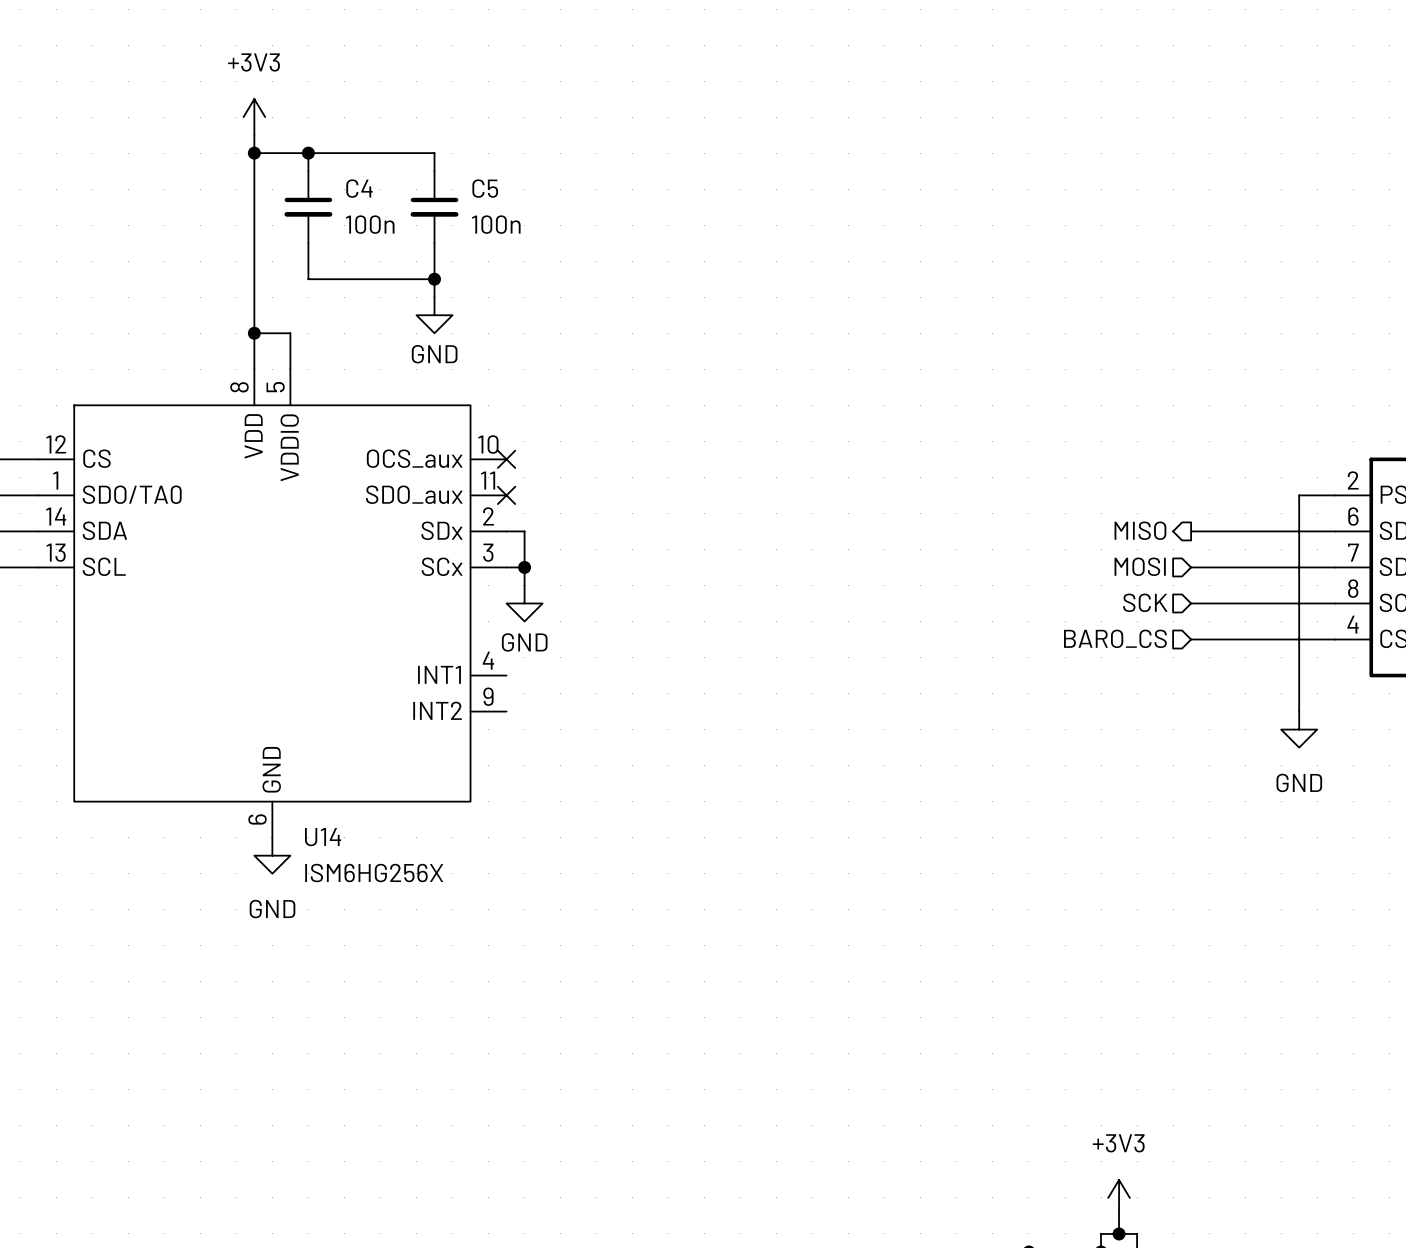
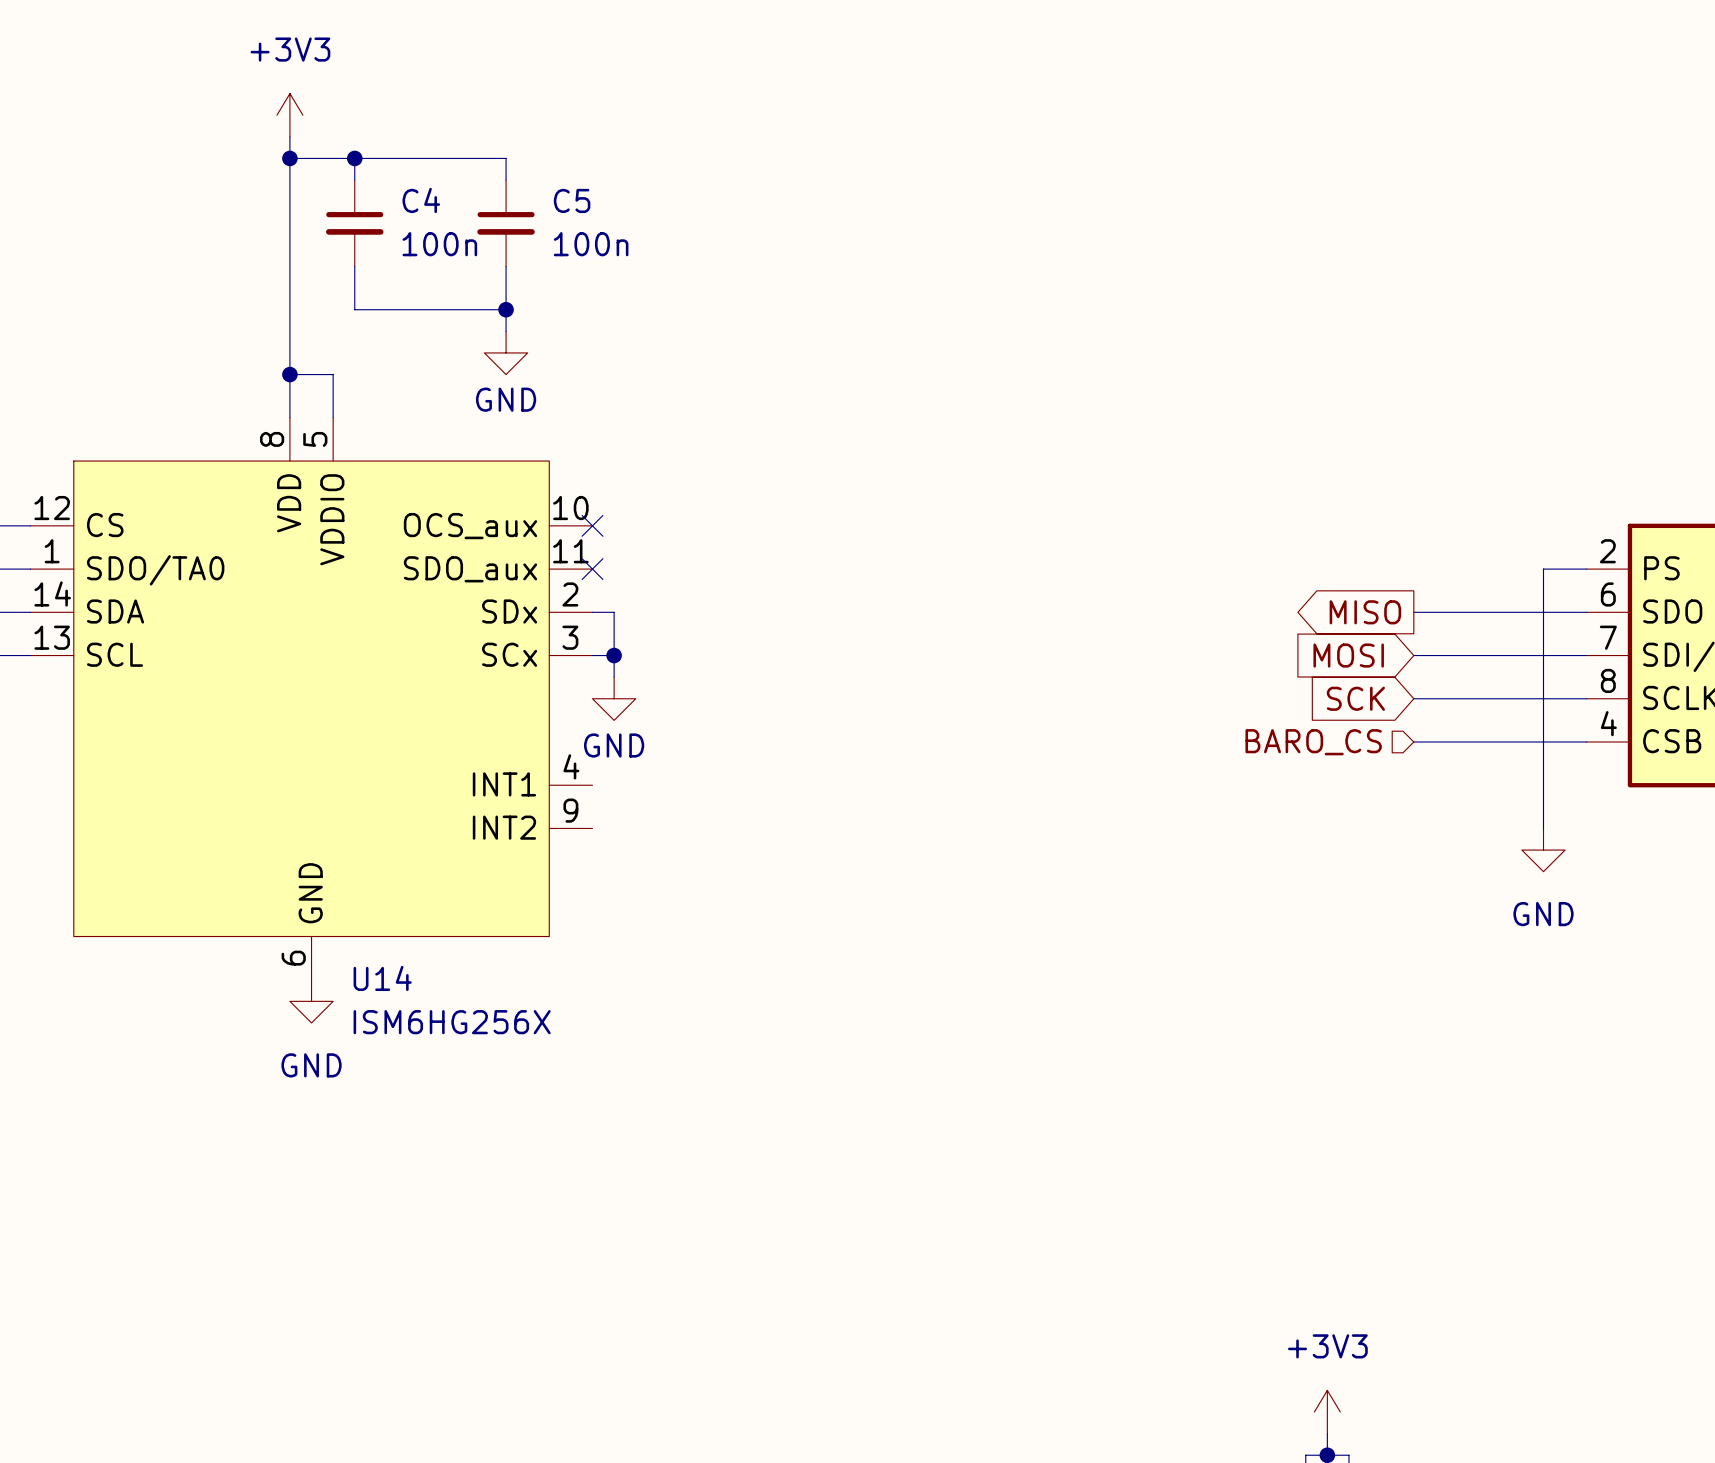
hierarchical label: MISO (1140, 530) -> none
global label: none -> MISO (1365, 612)
hierarchical label: MOSI (1140, 566) -> none
global label: none -> MOSI (1348, 655)
hierarchical label: SCK (1145, 602) -> none
global label: none -> SCK (1355, 698)

